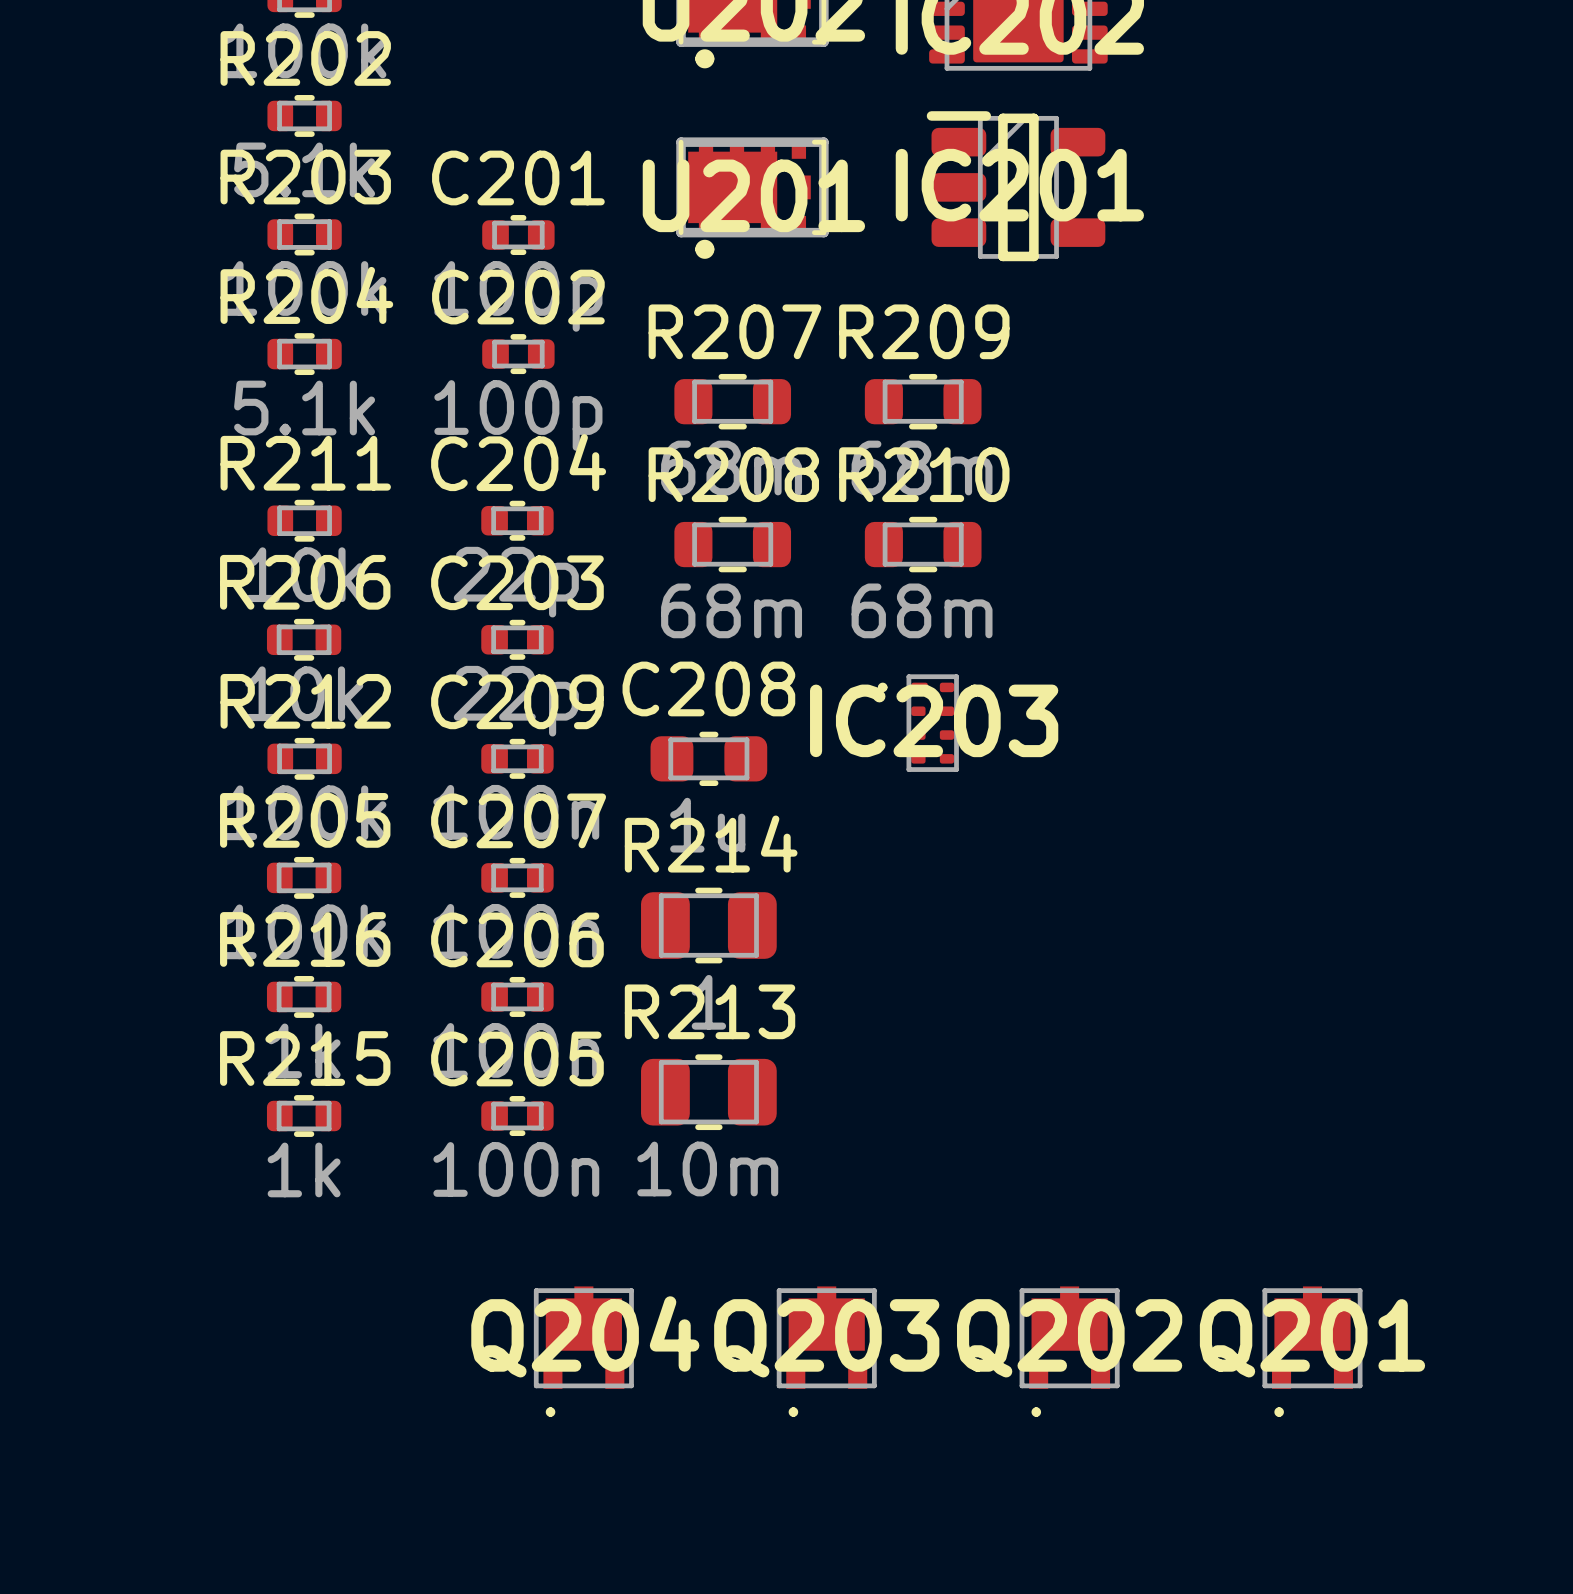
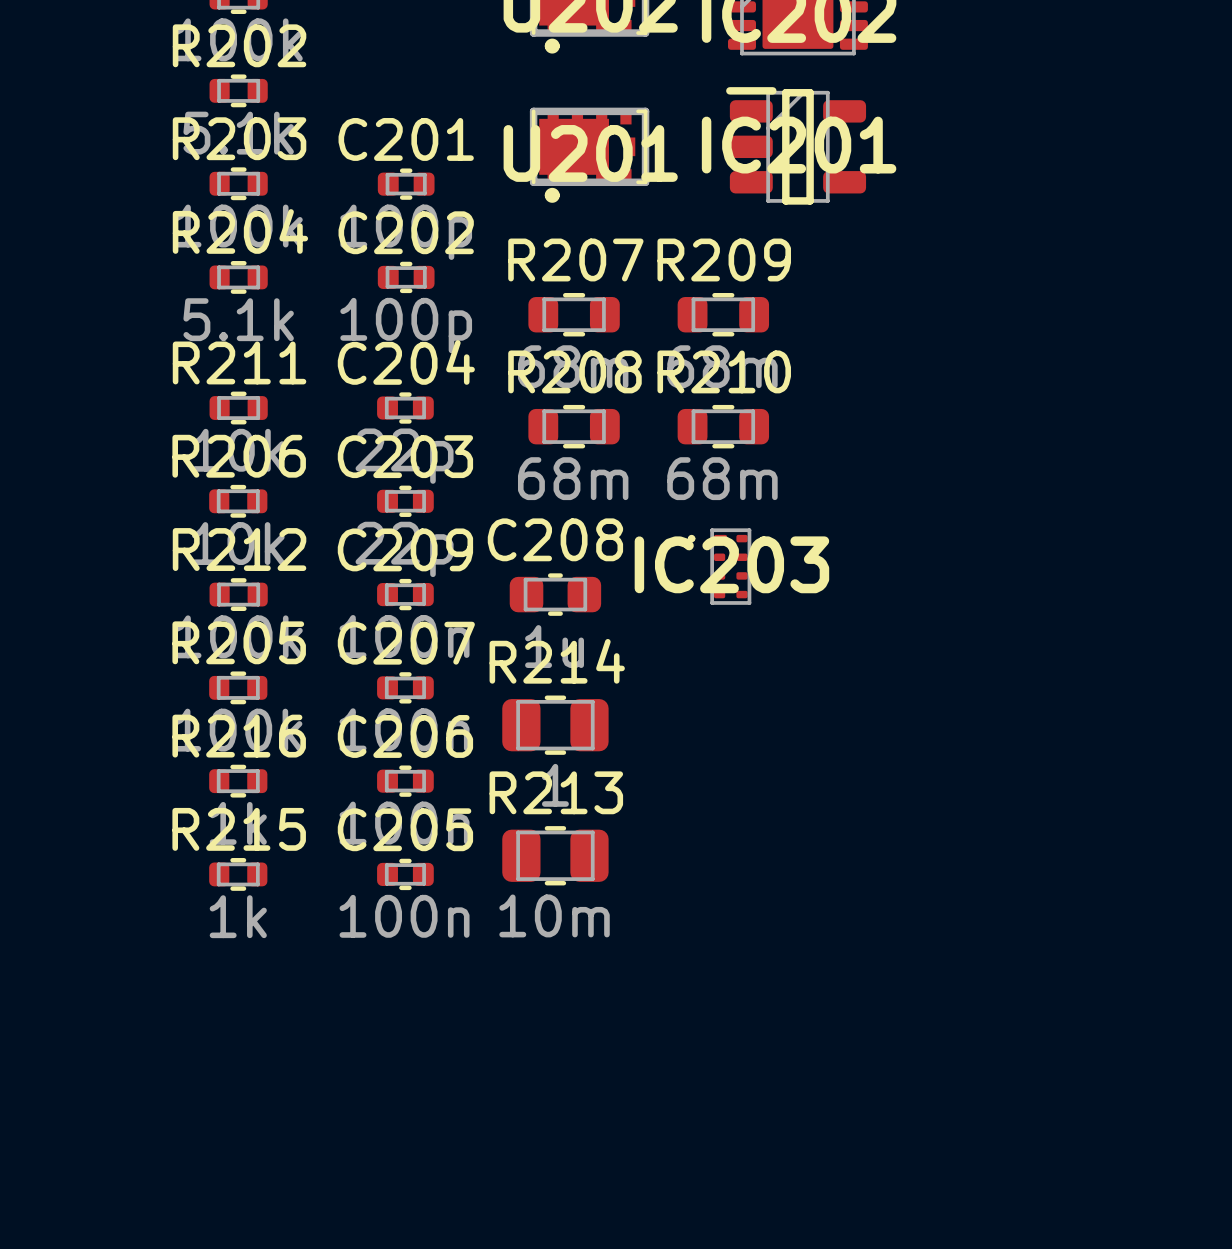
Q204: (583, 1351) -> none
Q203: (826, 1351) -> none
Q202: (1069, 1351) -> none
Q201: (1312, 1351) -> none

